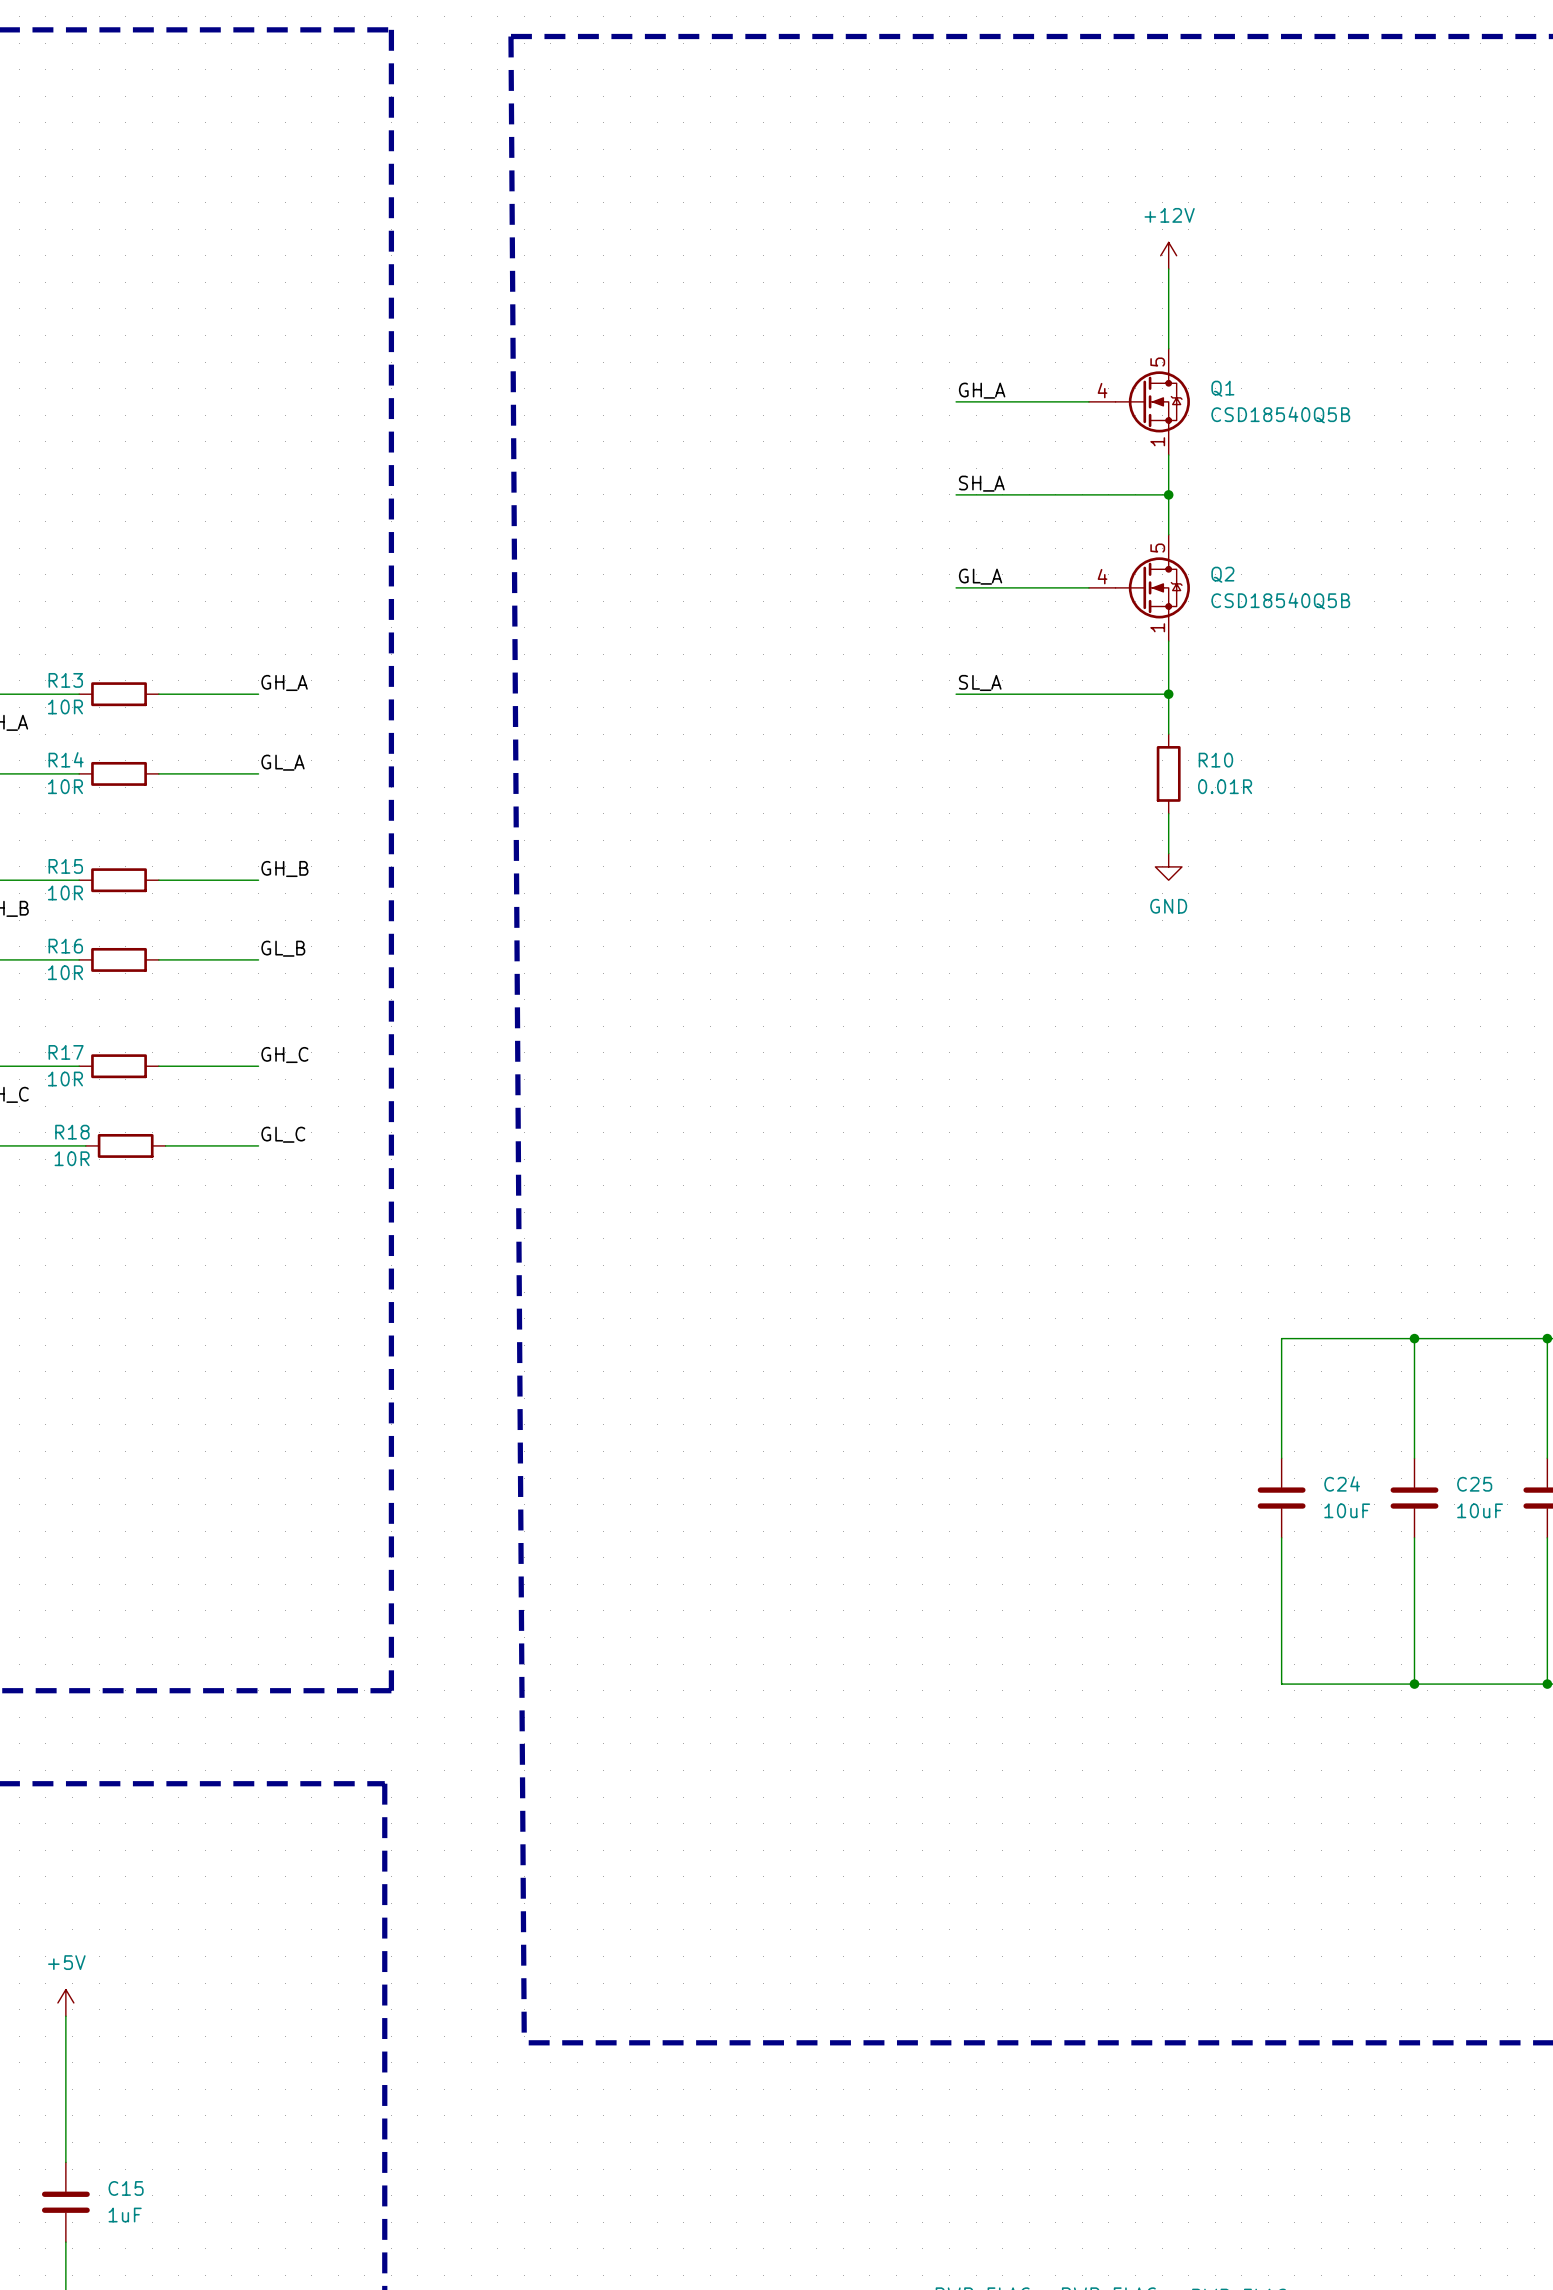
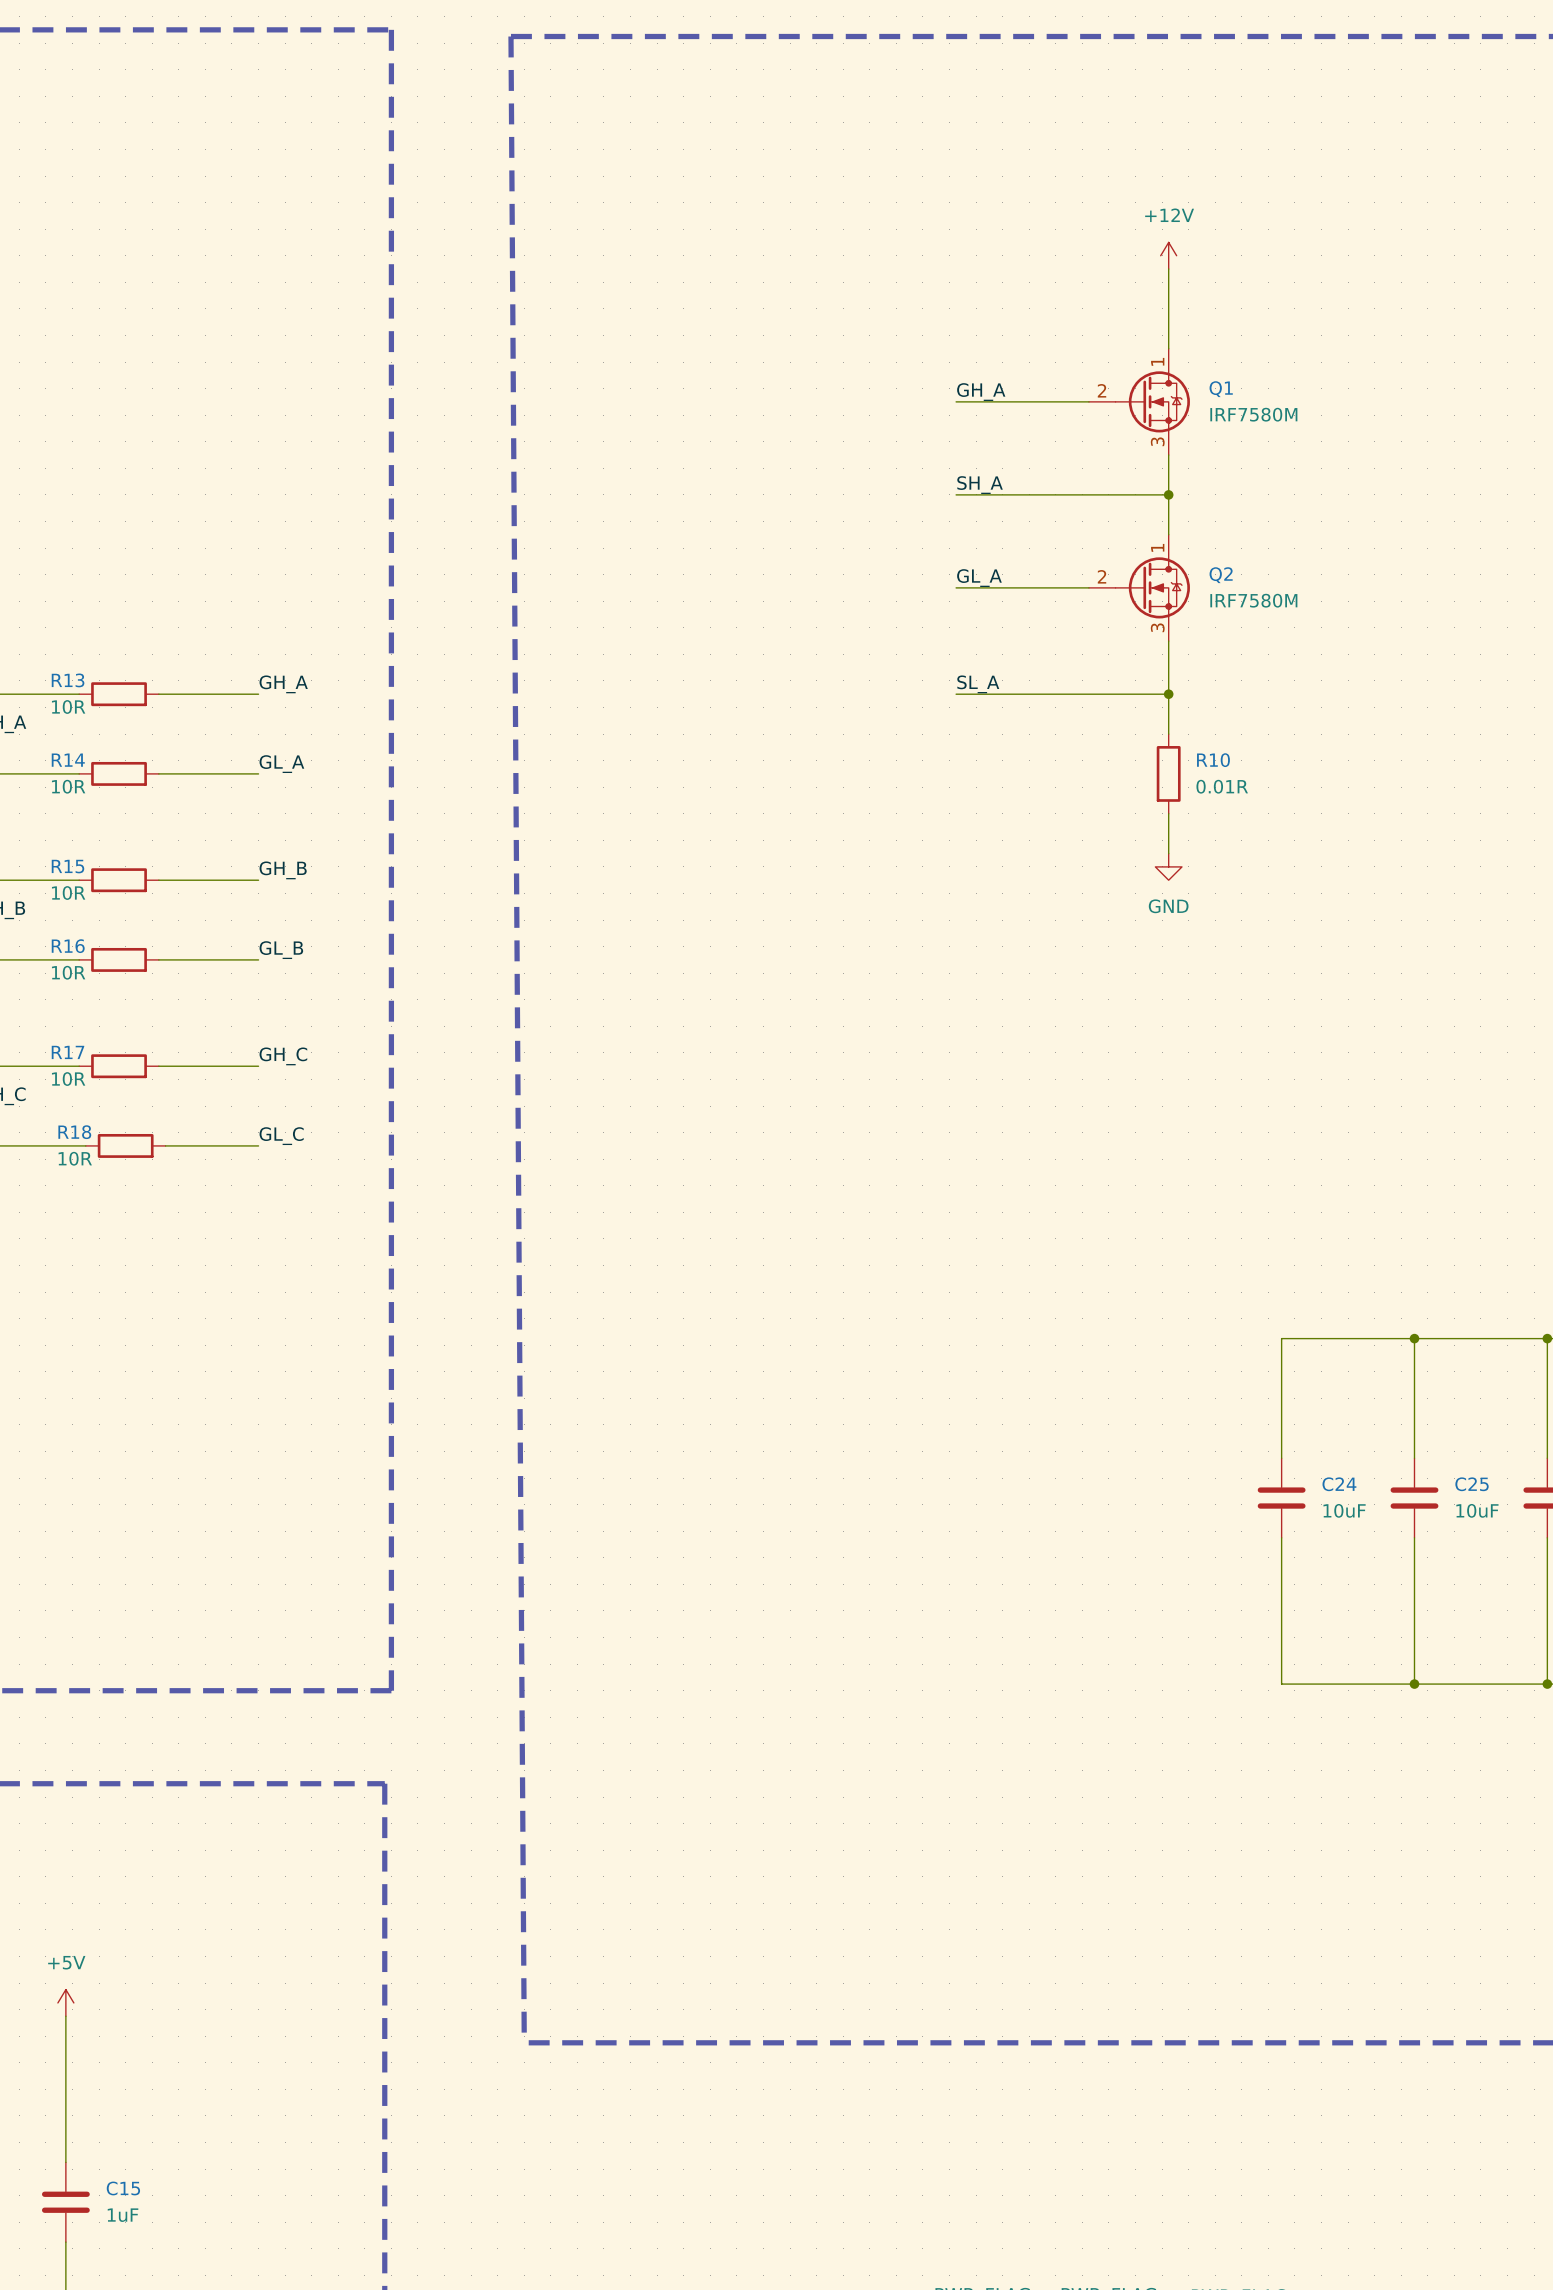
Q1 pin number: 5 (1157, 362) -> 1 (1157, 361)
Q1 pin number: 4 (1102, 390) -> 2 (1102, 390)
Q1 value: CSD18540Q5B (1280, 414) -> IRF7580M (1253, 414)
Q1 pin number: 1 (1157, 441) -> 3 (1157, 441)
Q2 pin number: 5 (1157, 548) -> 1 (1157, 547)
Q2 pin number: 4 (1102, 576) -> 2 (1102, 576)
Q2 value: CSD18540Q5B (1280, 601) -> IRF7580M (1253, 600)
Q2 pin number: 1 (1157, 627) -> 3 (1157, 627)

